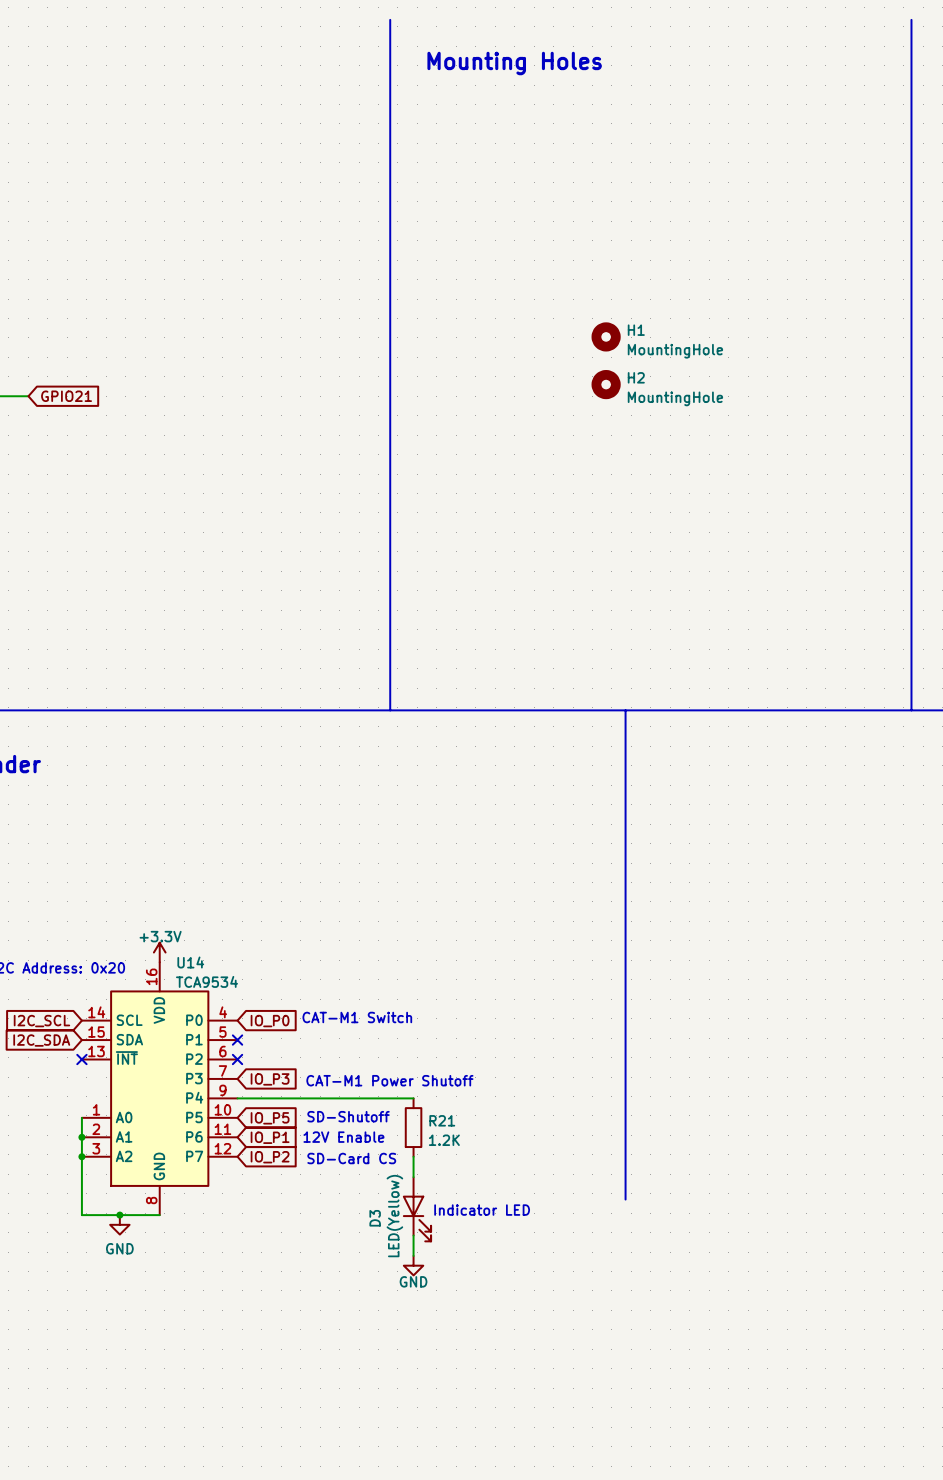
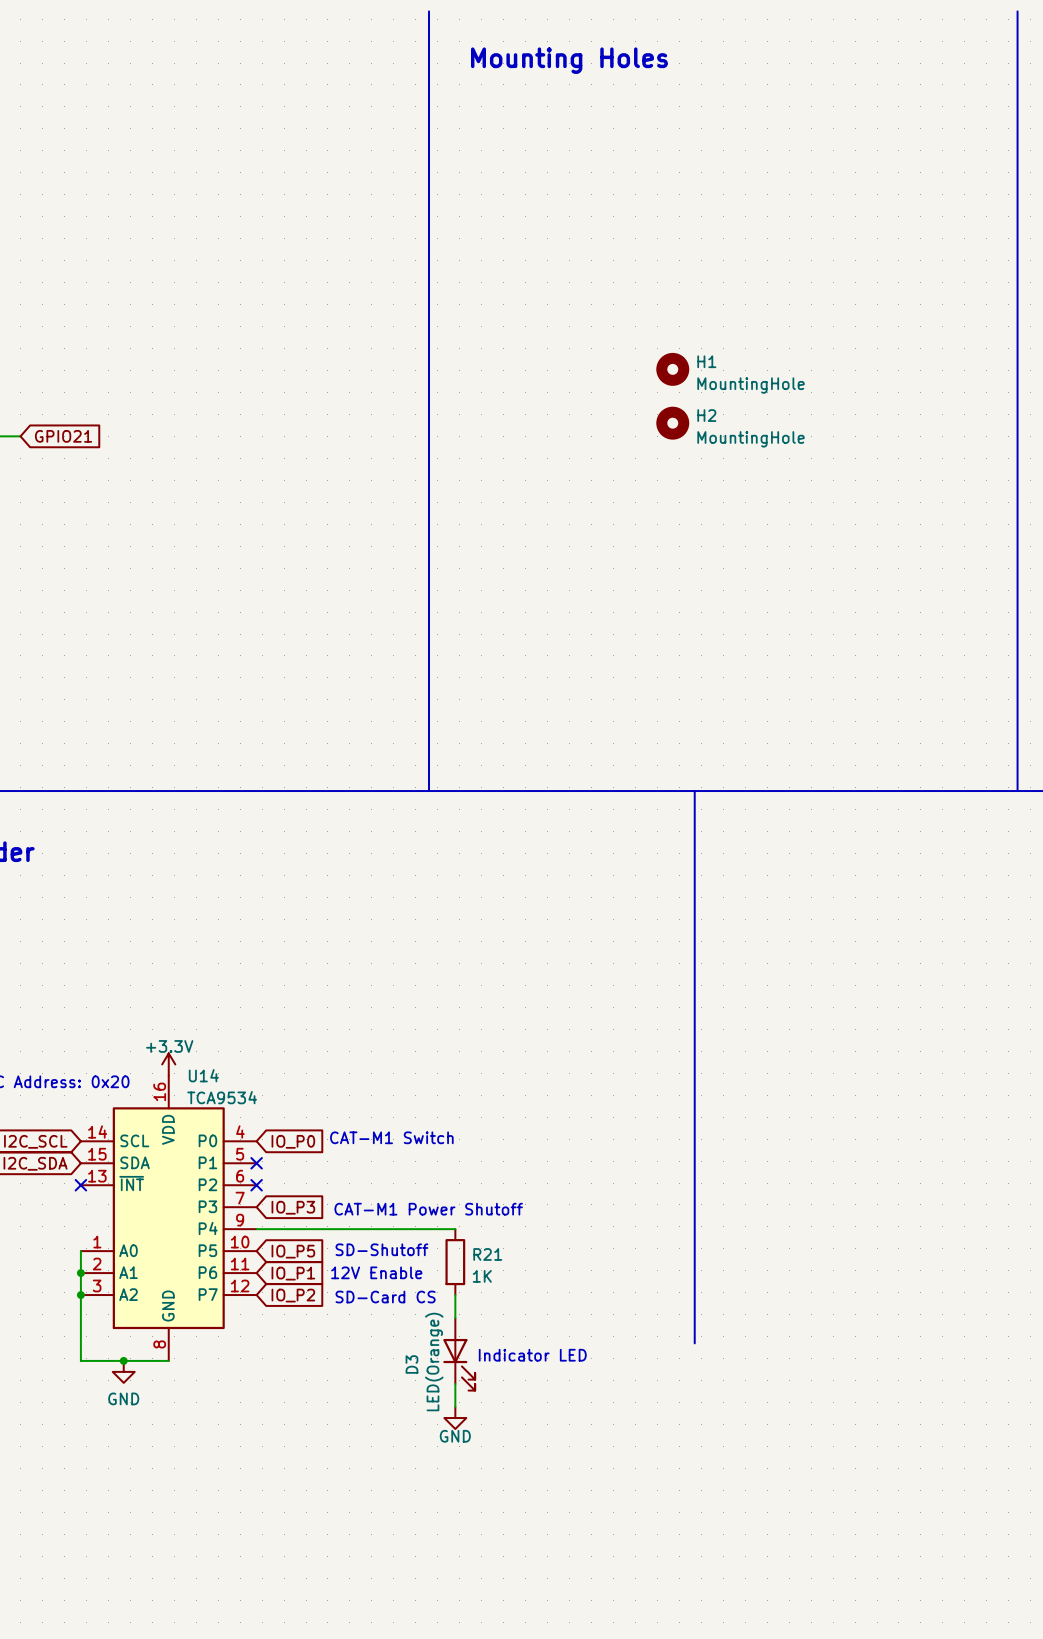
R21 value: 1.2K (444, 1140) -> 1K (482, 1276)
D3 value: LED(Yellow) (394, 1216) -> LED(Orange) (434, 1362)

